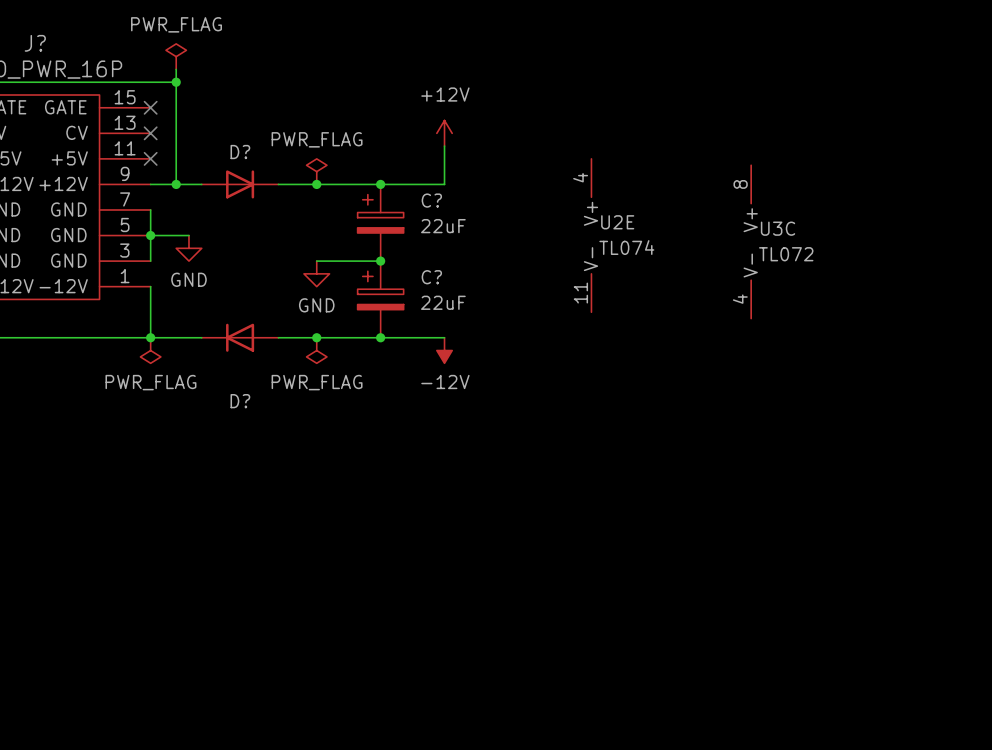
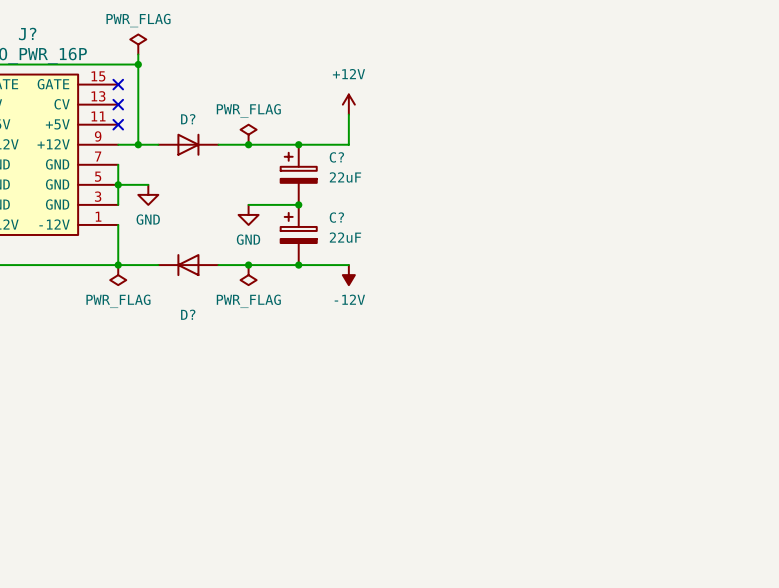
U2E: TL074 (591, 235) -> none
U3C: TL072 (751, 241) -> none

